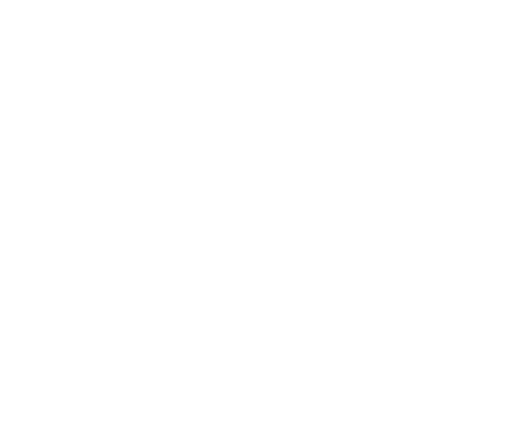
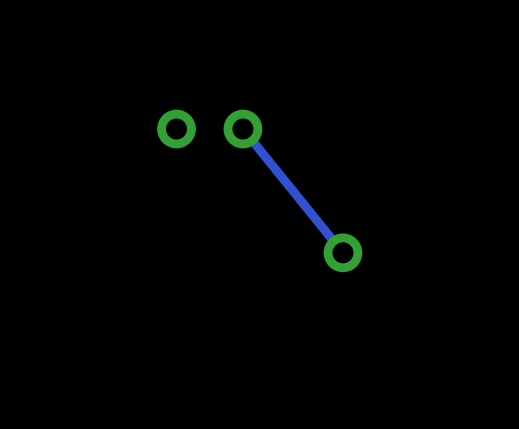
part: none -> (209, 129)
track: none -> (242, 129) (342, 252)
via: none -> (342, 252)

